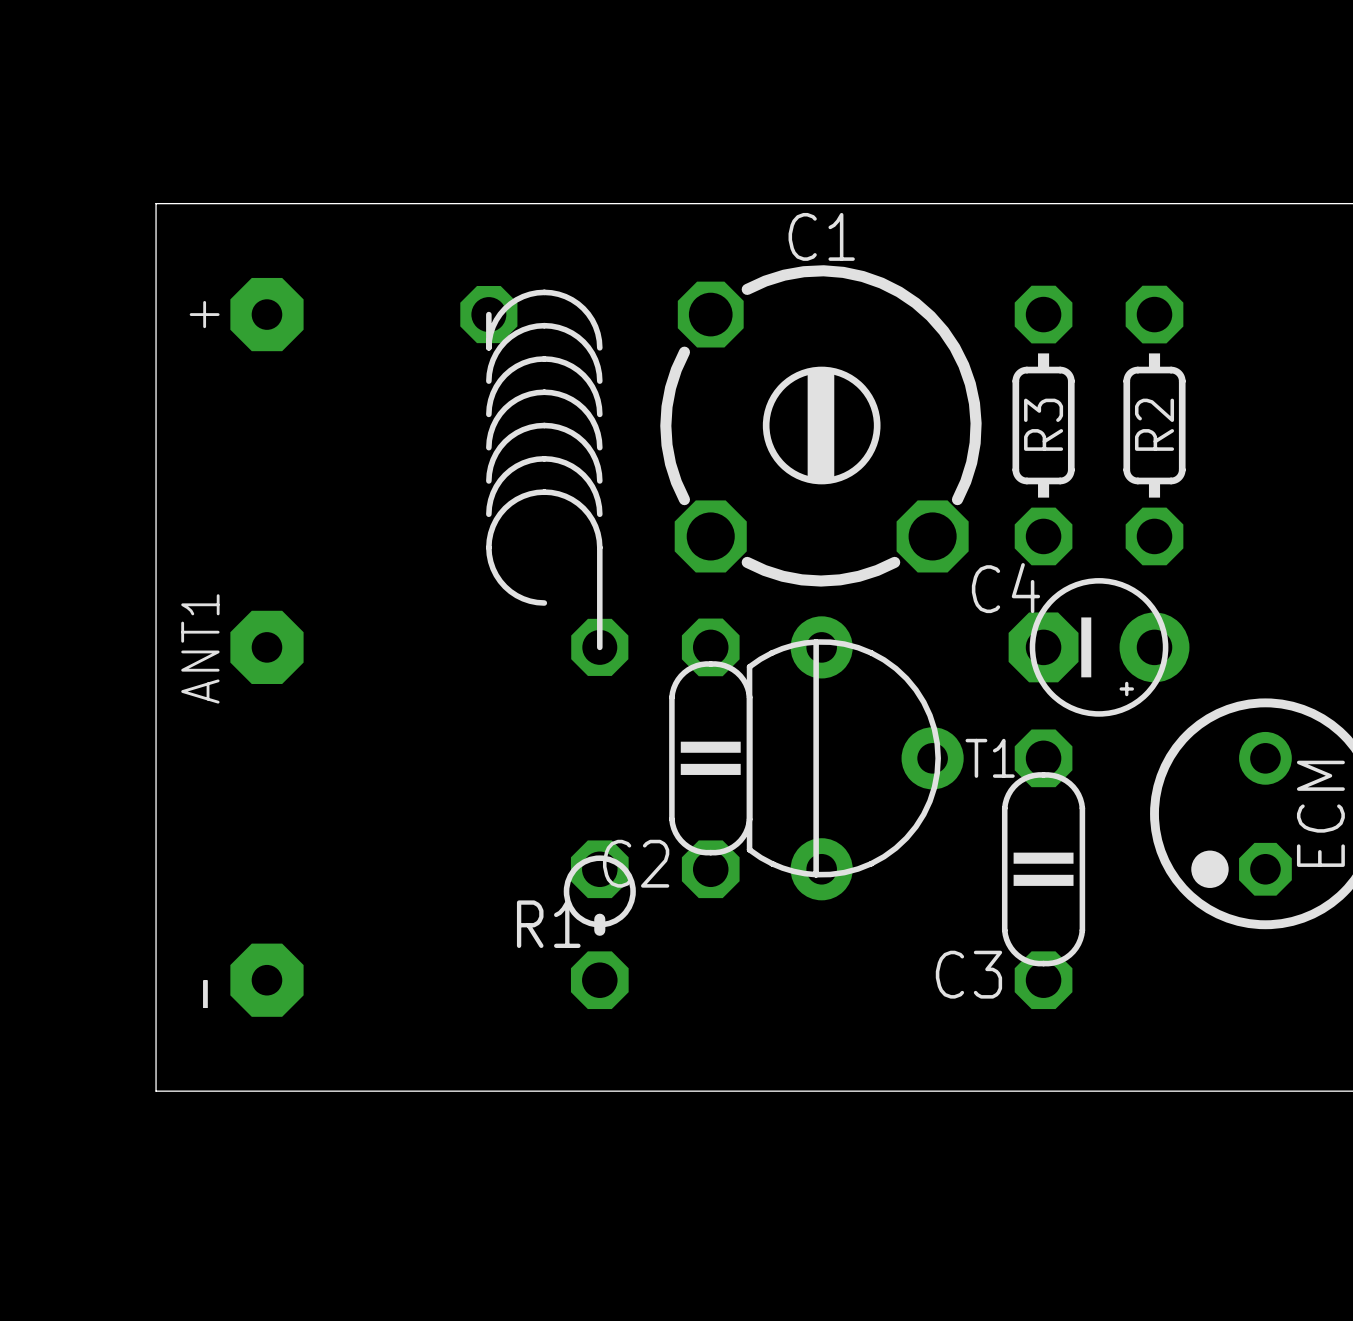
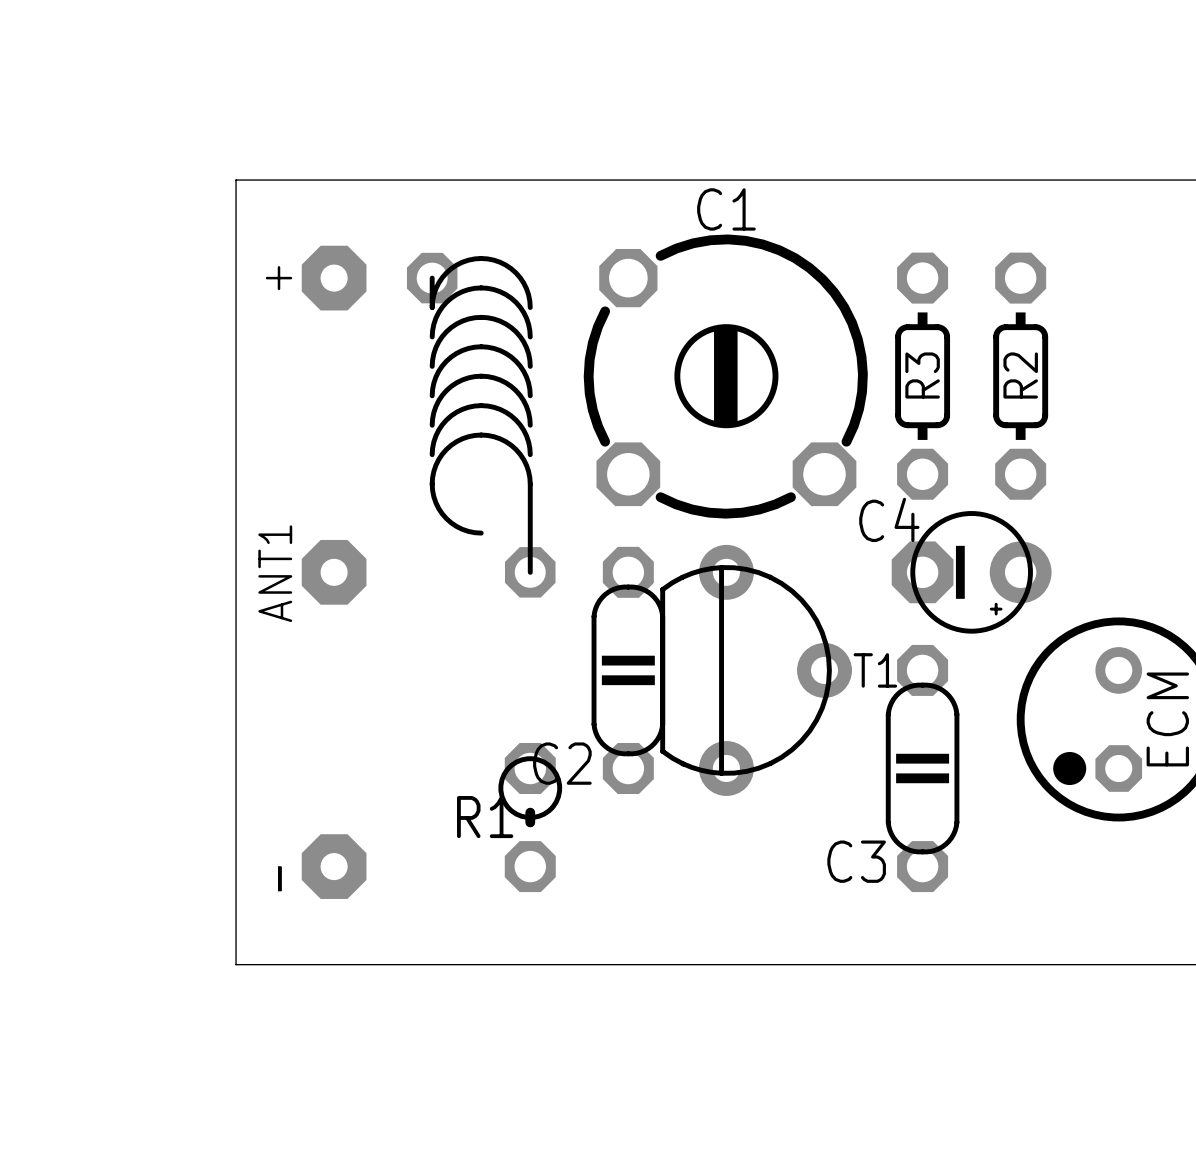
board edge: (266, 203) (156, 203) (156, 1091) (266, 1091) -> (236, 180) (236, 964)
part position: (266, 314) -> (334, 278)
ANT1 position: (266, 647) -> (334, 572)
part position: (266, 980) -> (334, 866)

